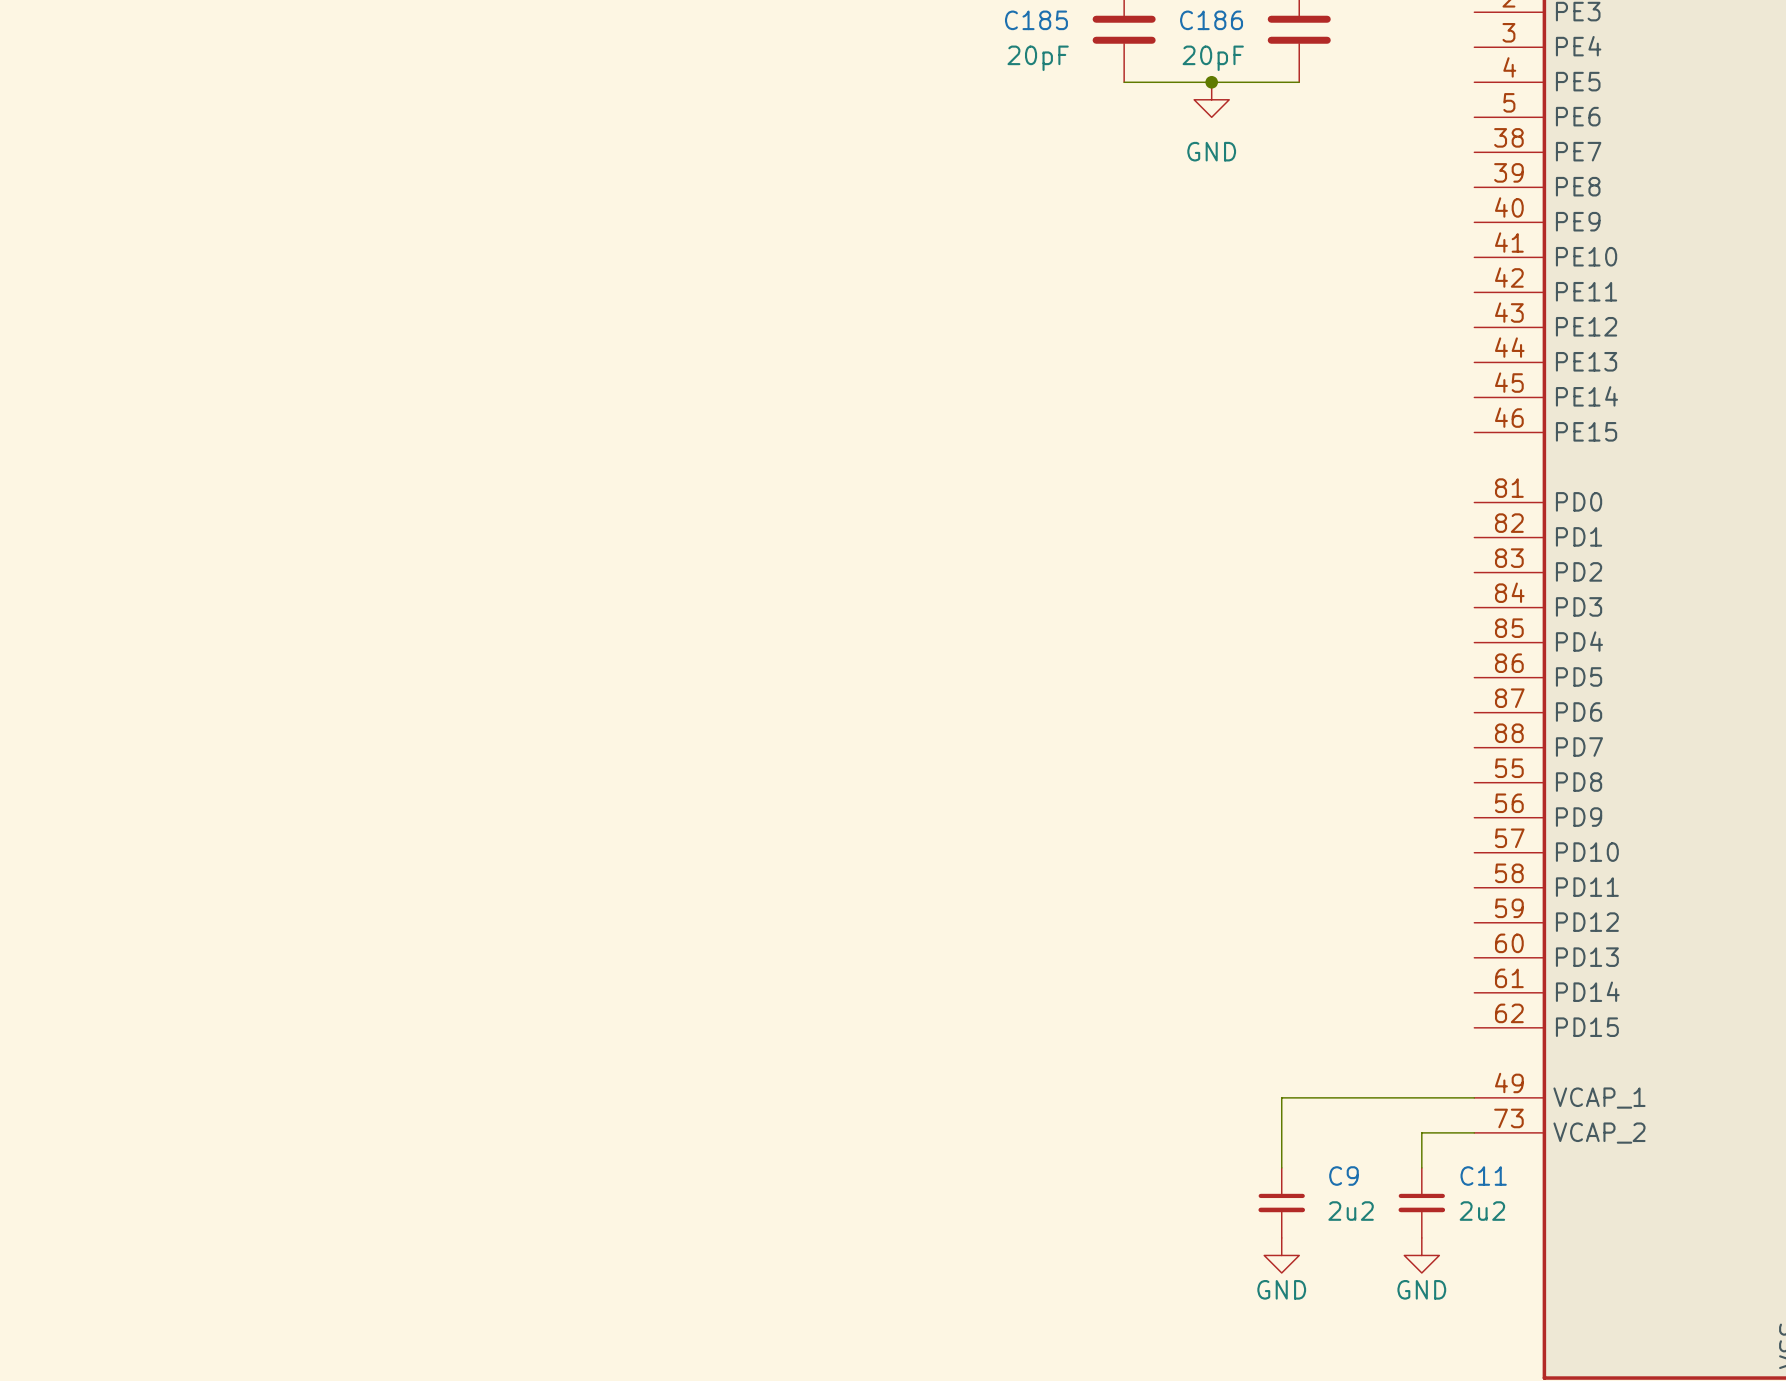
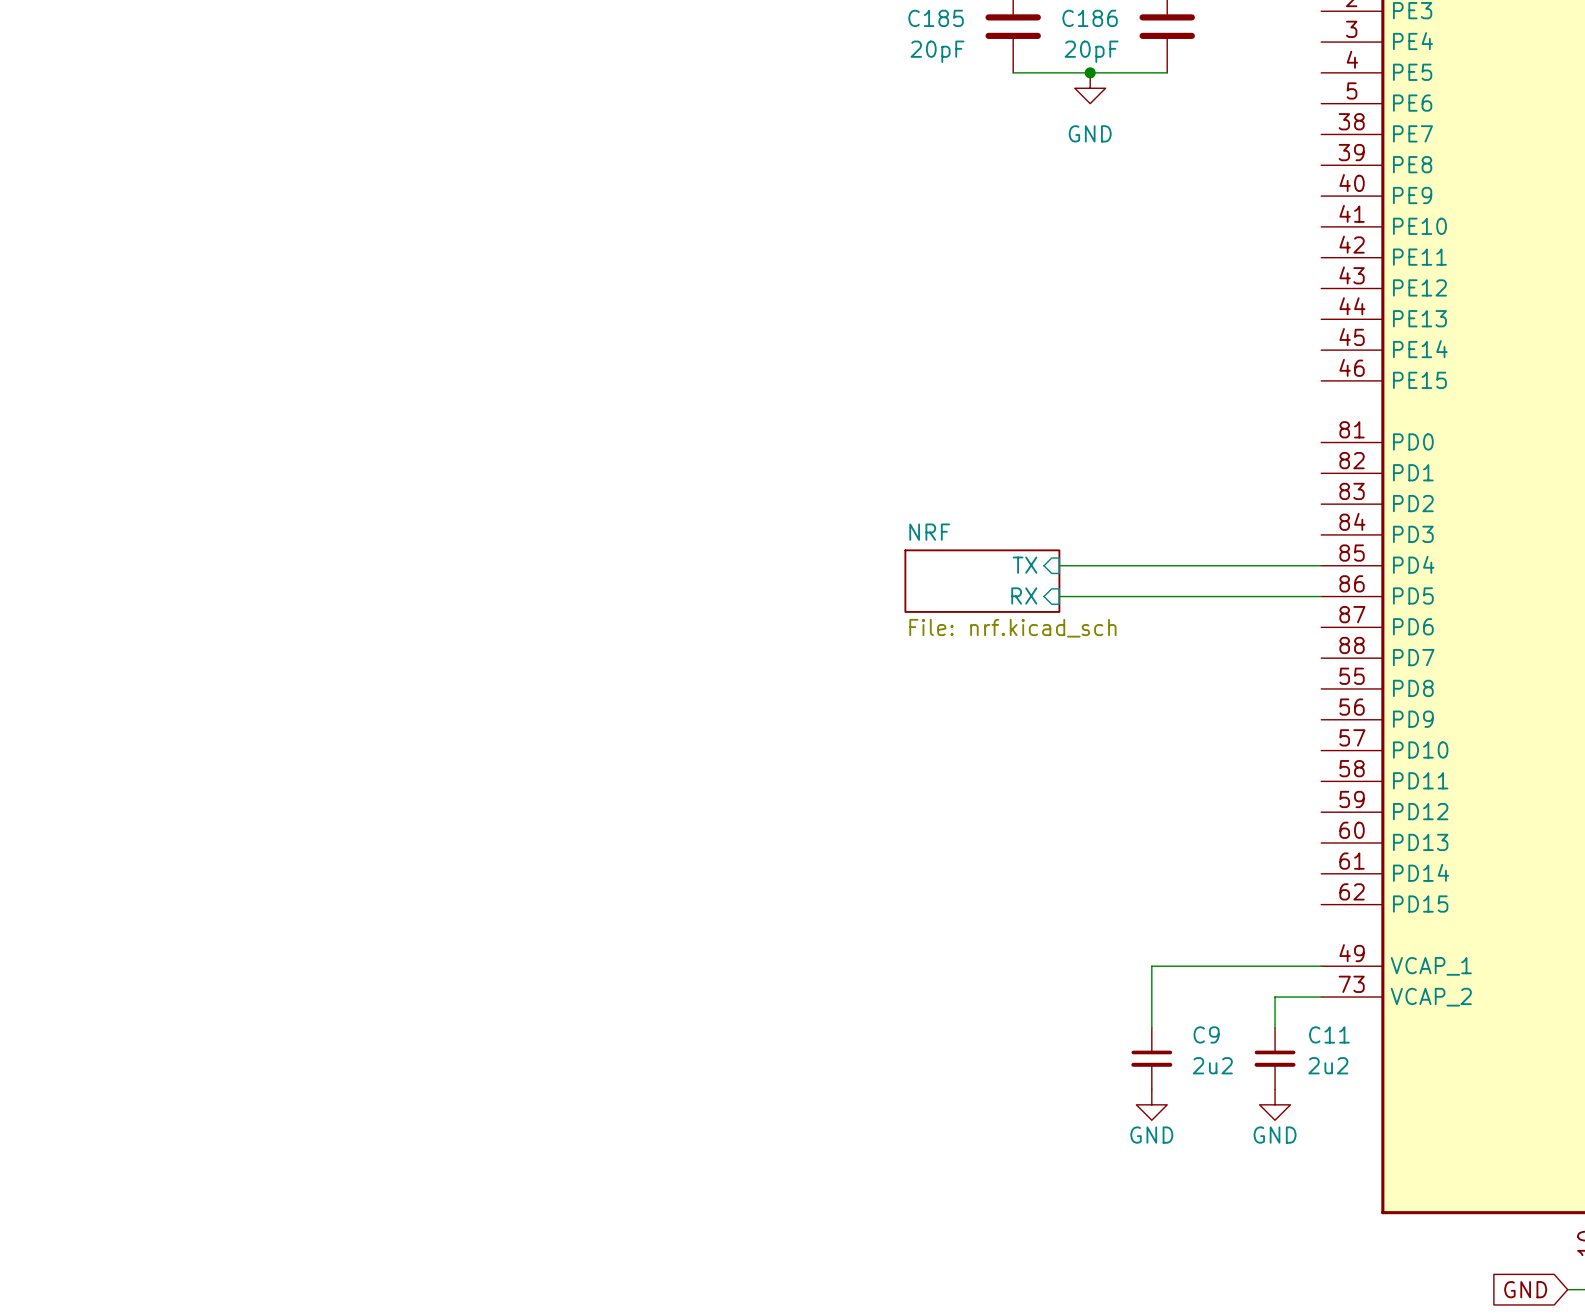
sheet pin: none -> TX (1025, 565)
wire: none -> (1059, 565) (1321, 565)
sheet NRF: none -> File: nrf.kicad_sch (982, 581)
sheet pin: none -> RX (1024, 595)
wire: none -> (1059, 596) (1321, 596)

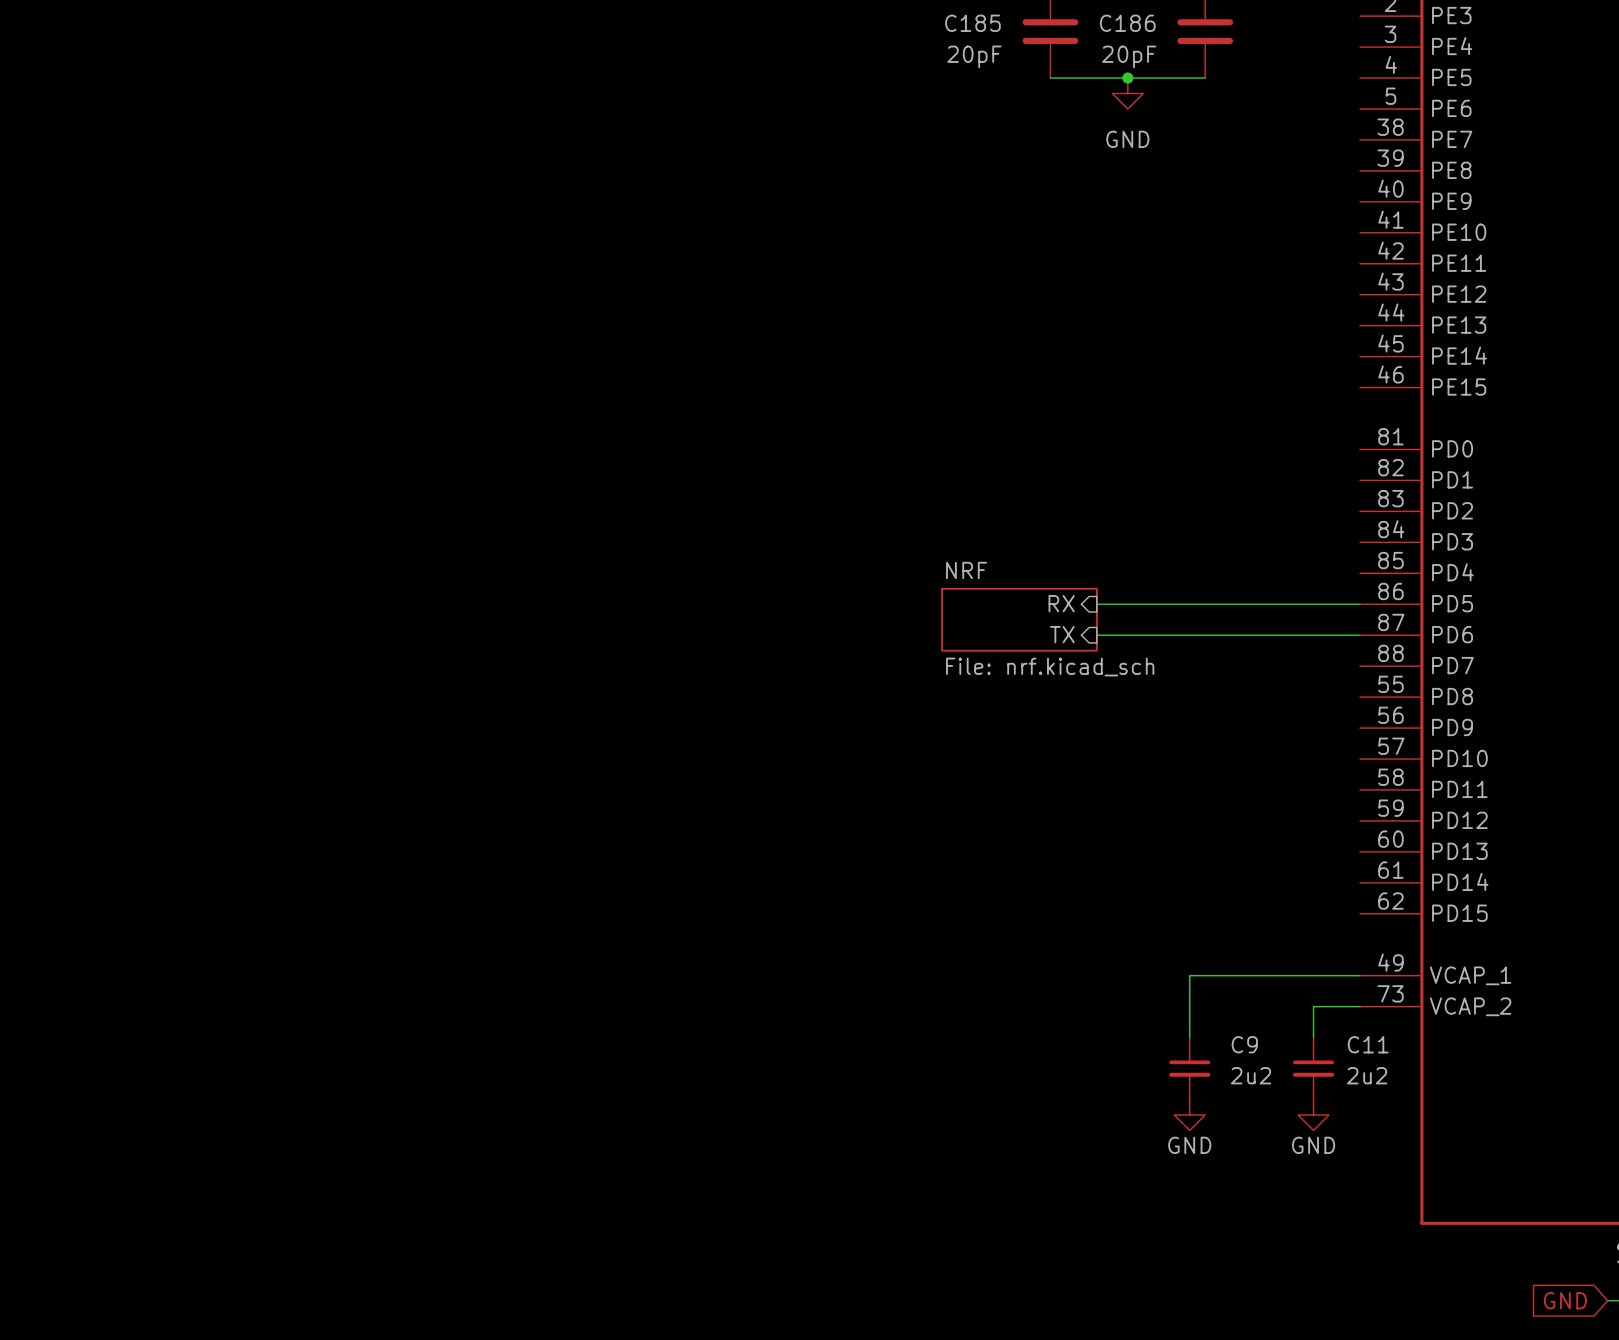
sheet pin position: TX (1025, 565) -> TX (1062, 634)
wire: (1059, 565) (1321, 565) -> (1096, 635) (1359, 635)
sheet NRF position: (982, 581) -> (1019, 619)

